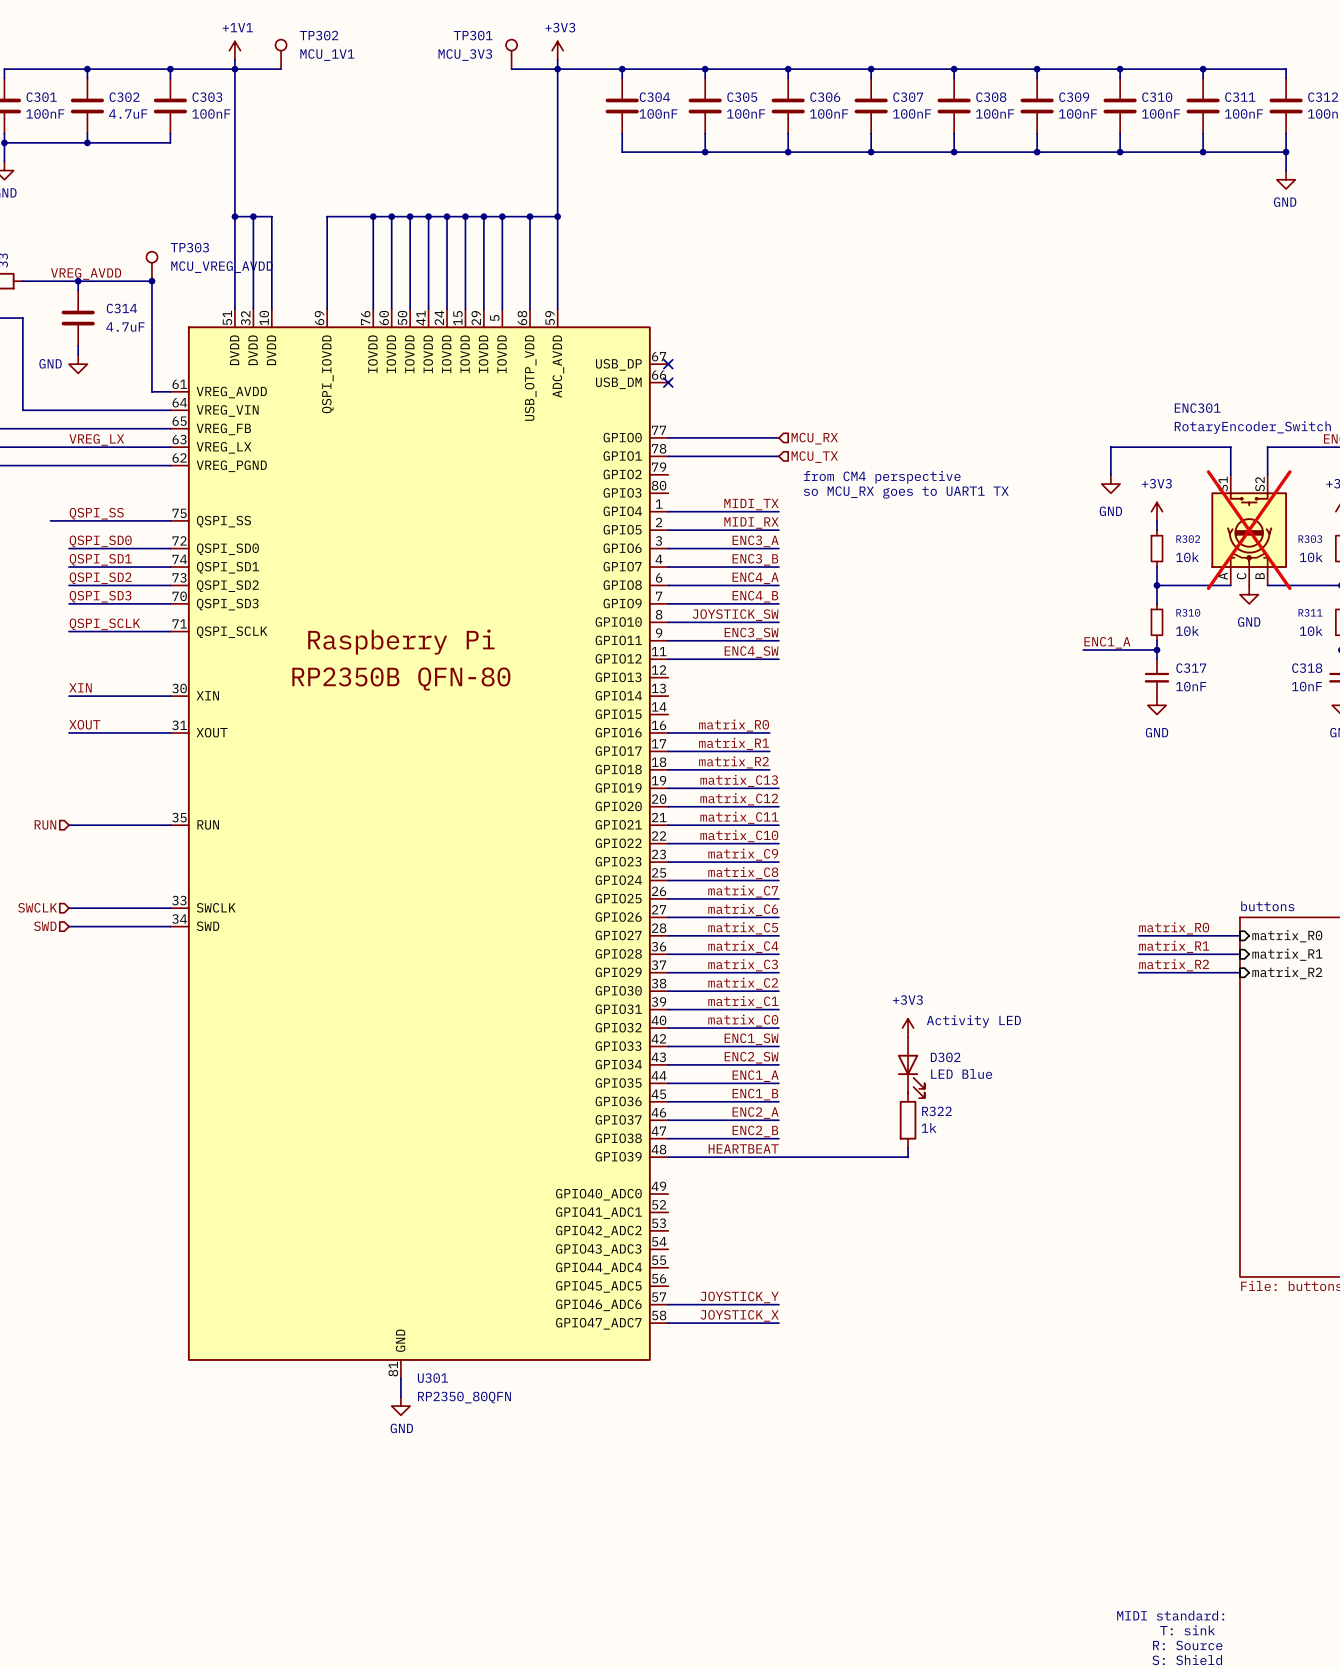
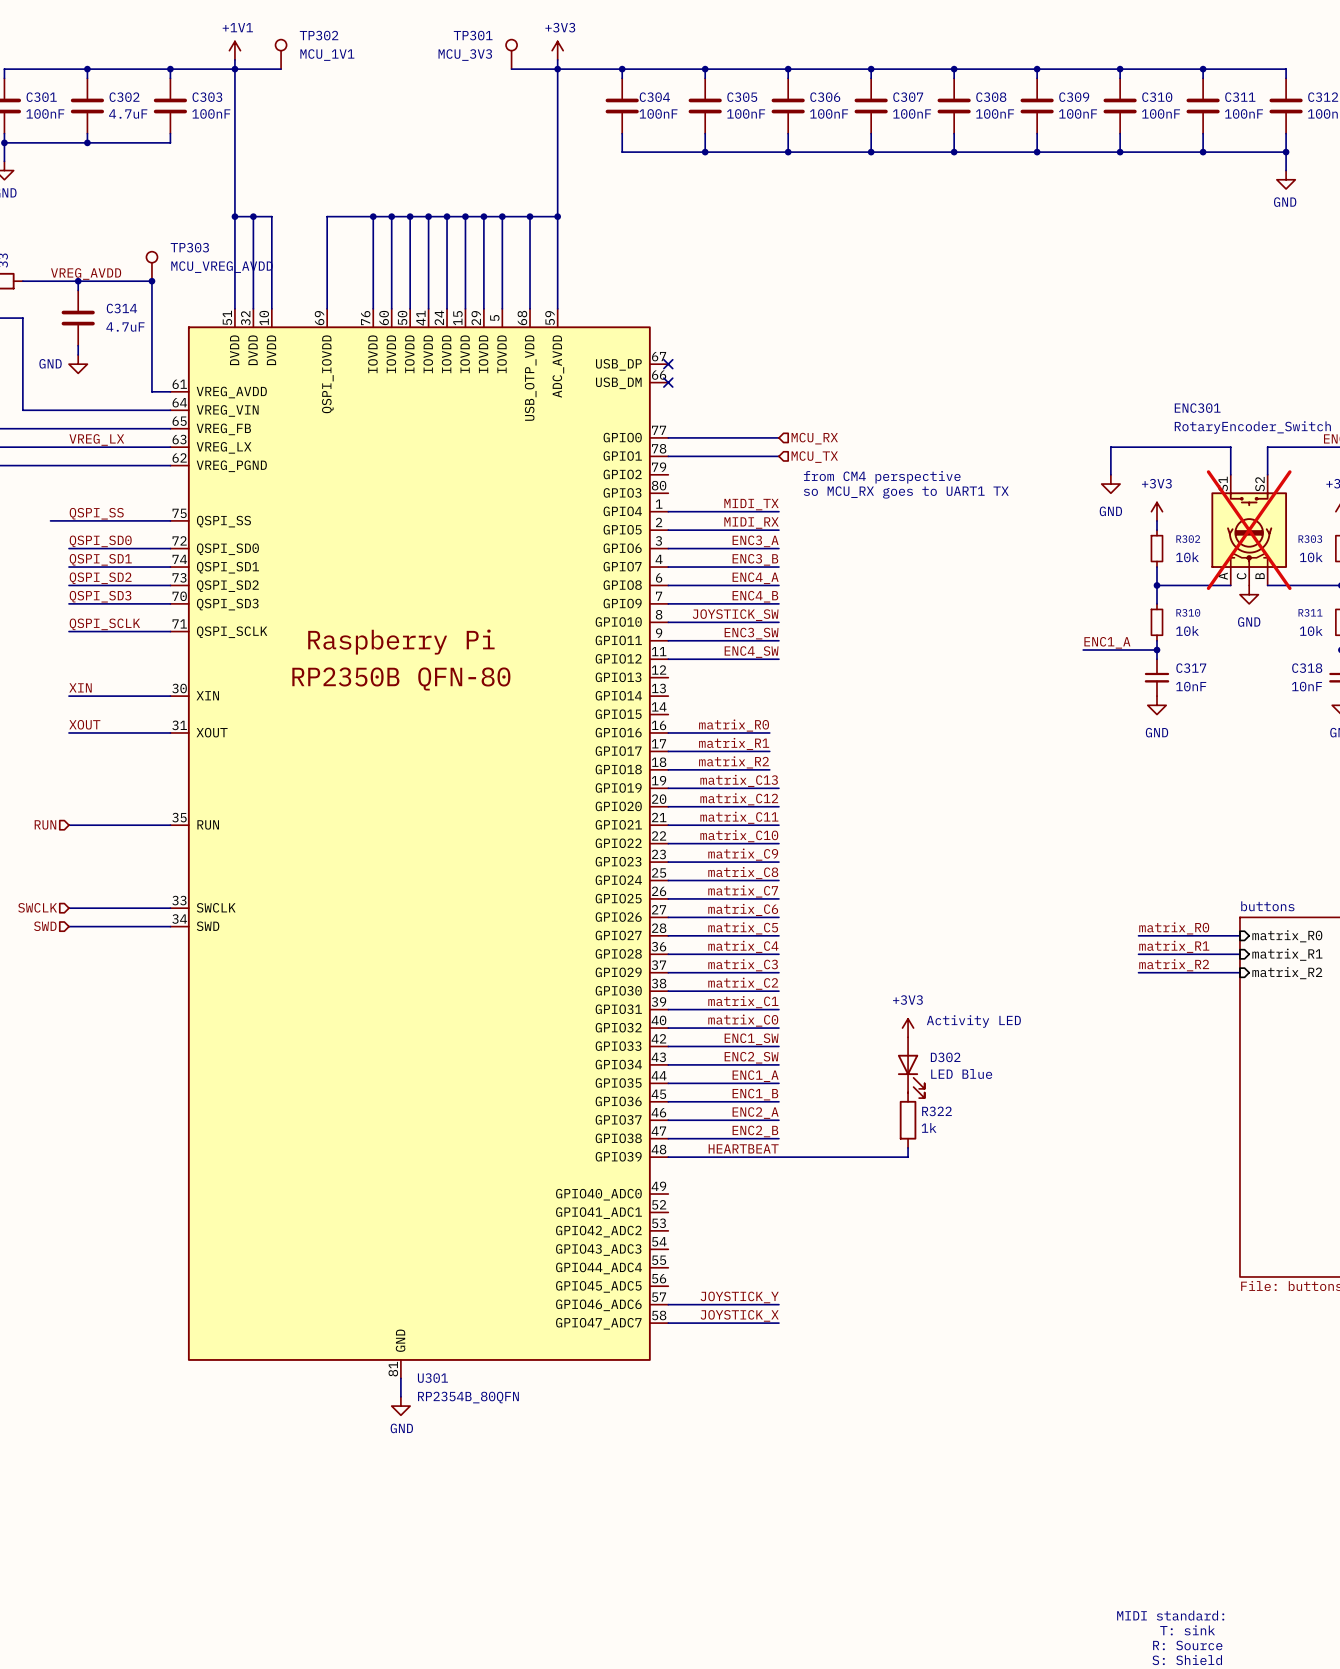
U301 value: RP2350_80QFN (464, 1397) -> RP2354B_80QFN (468, 1397)

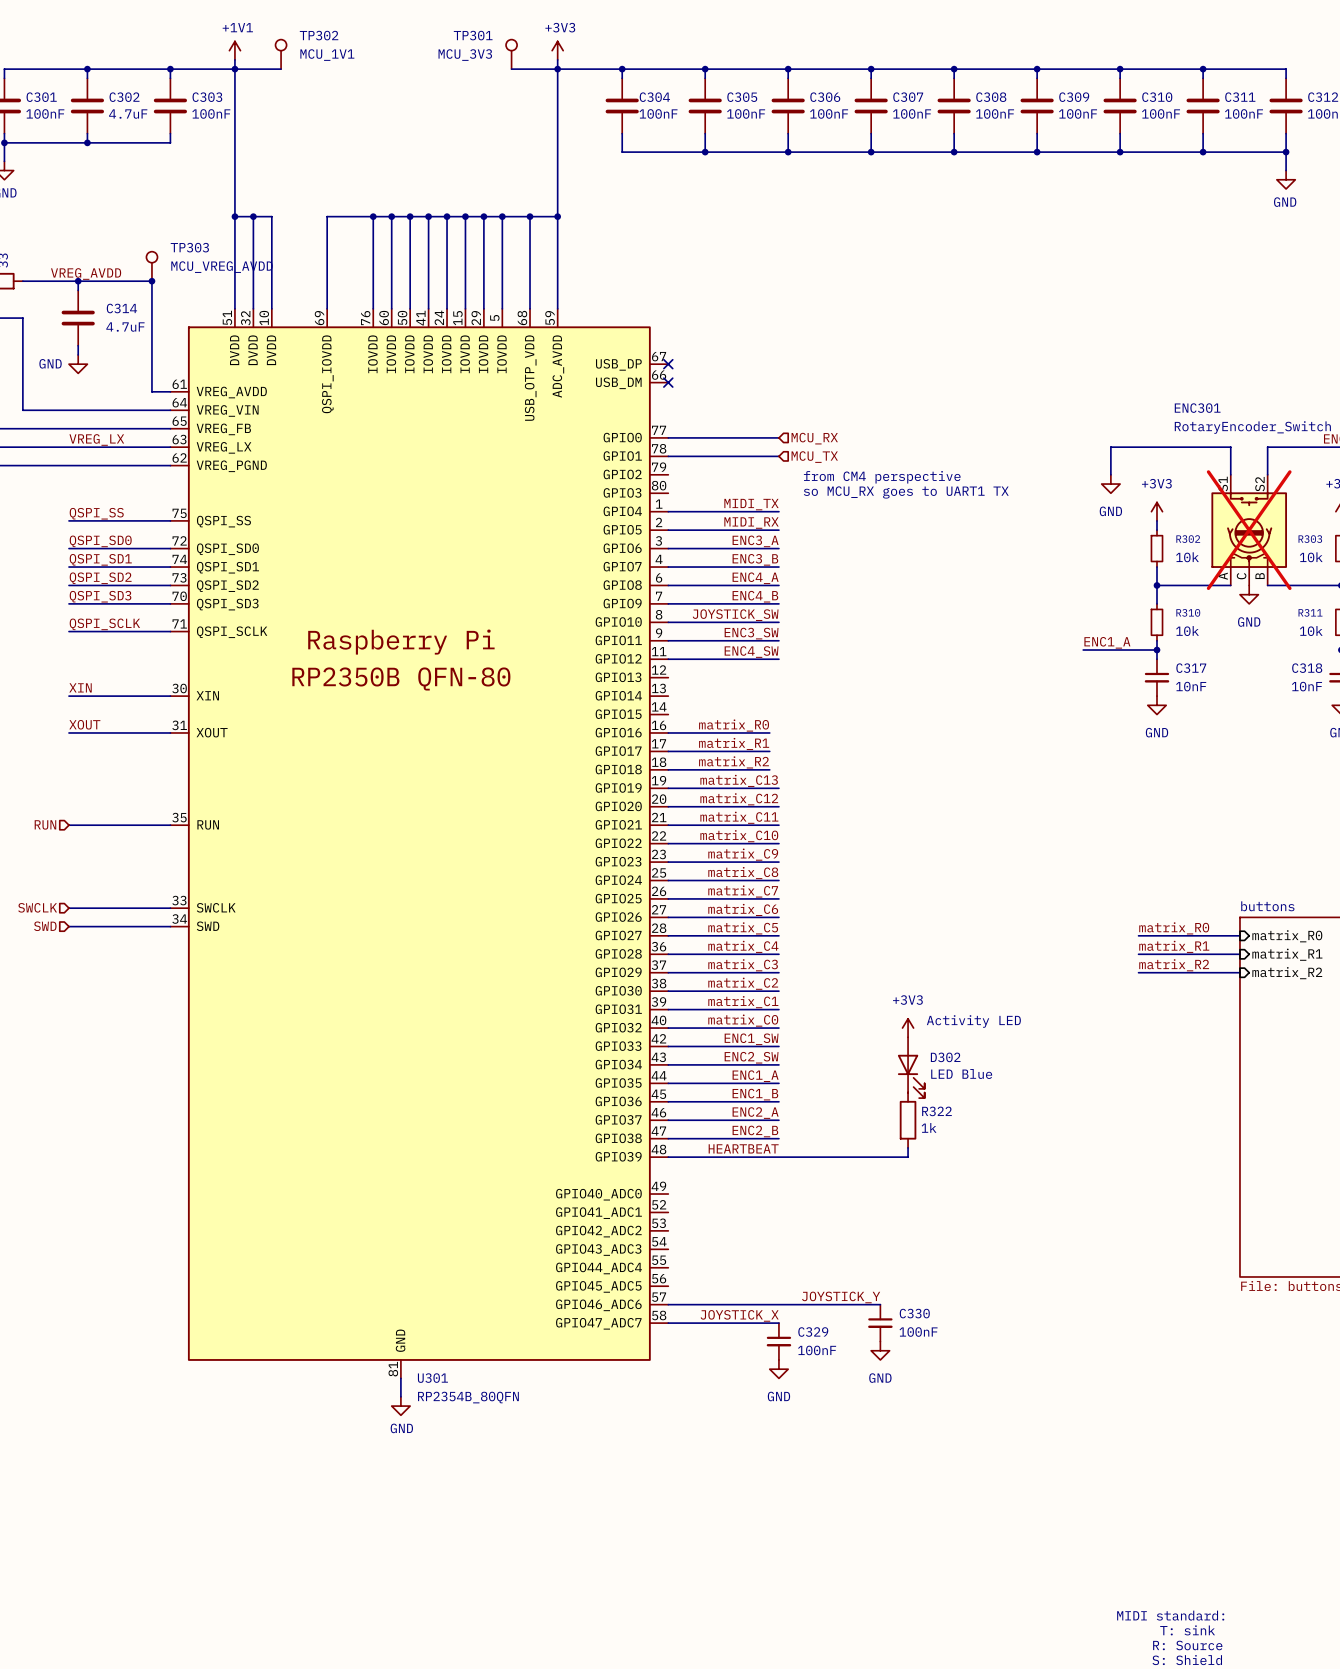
wire: (50, 520) (68, 520) -> none
label position: JOYSTICK_Y (739, 1297) -> JOYSTICK_Y (841, 1297)
wire: none -> (778, 1304) (880, 1304)
C330: none -> 100nF (880, 1323)
C329: none -> 100nF (778, 1341)
power symbol: none -> GND (880, 1350)
power symbol: none -> GND (778, 1369)

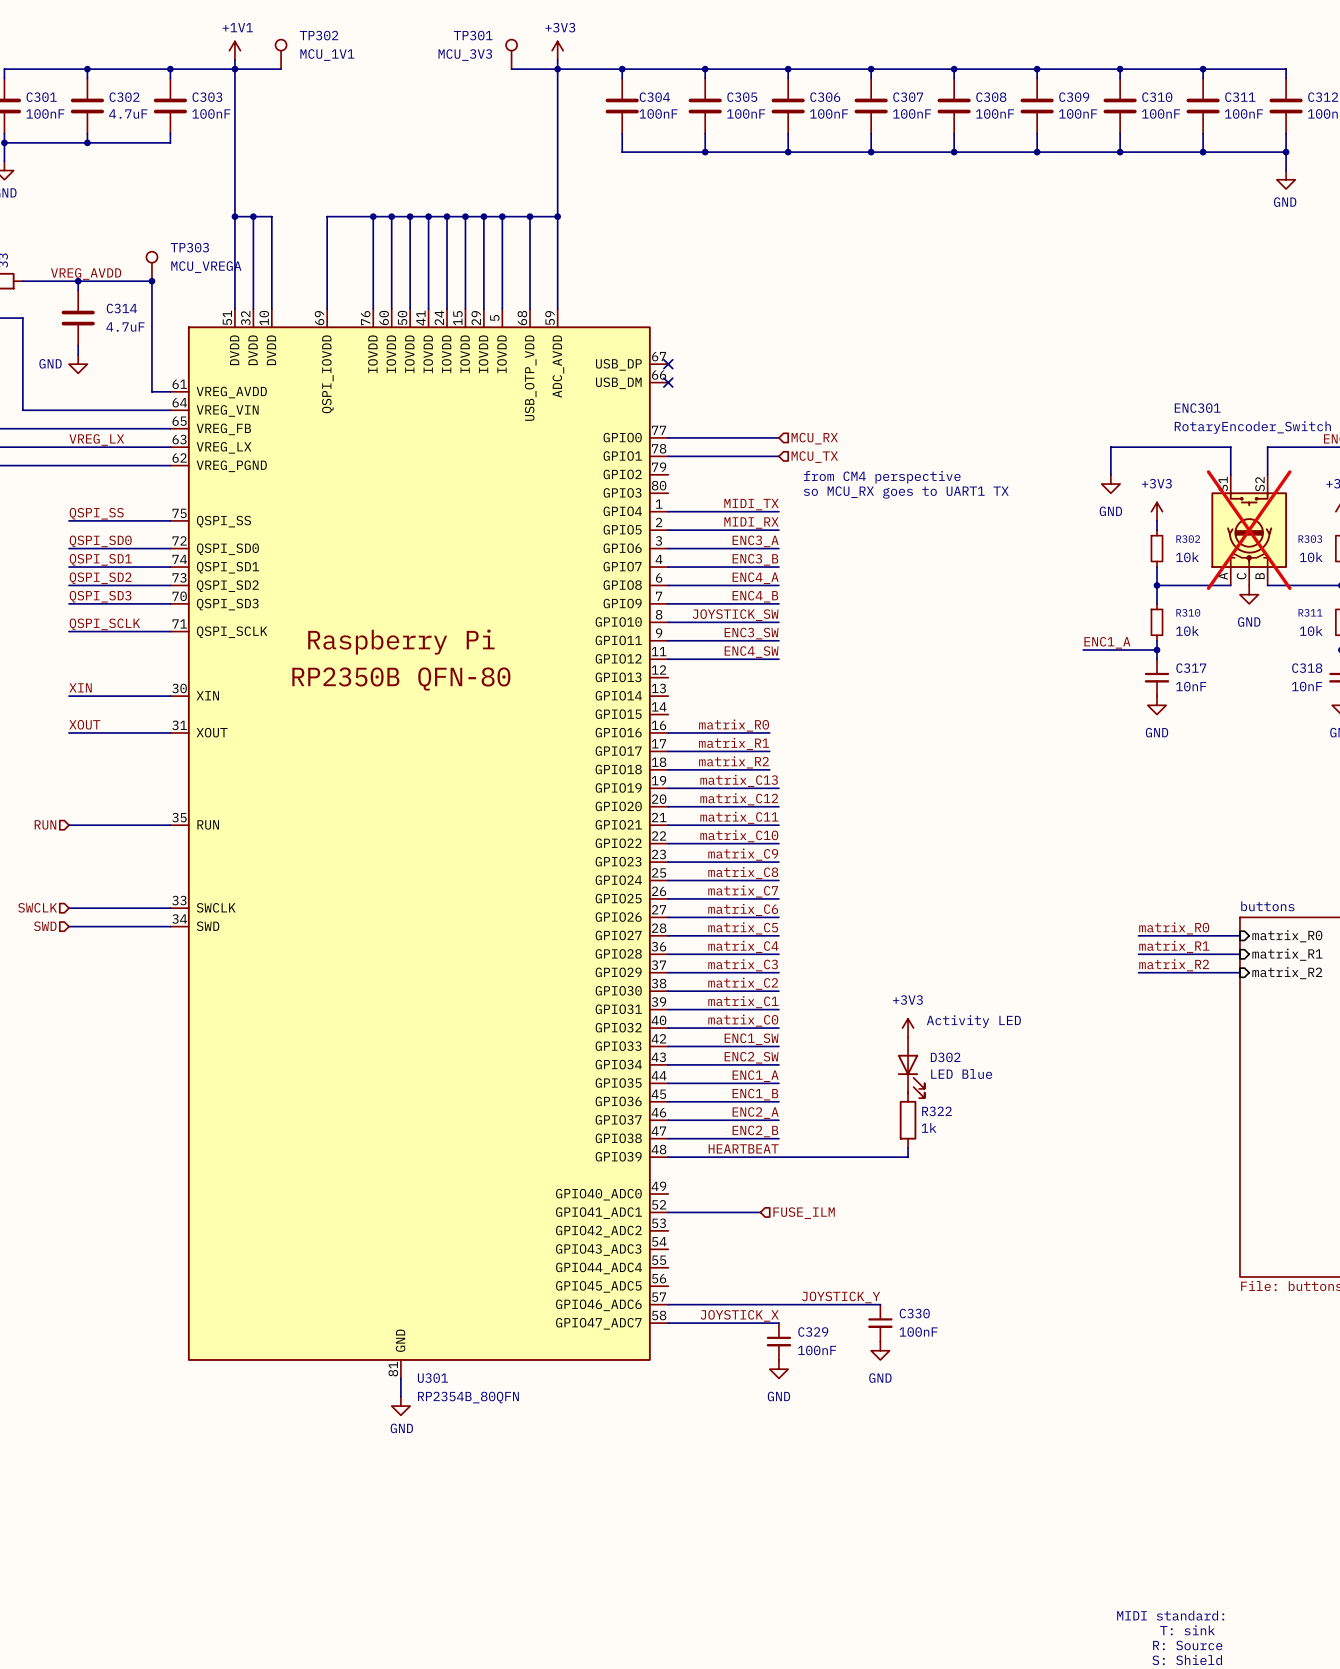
TP303 value: MCU_VREG_AVDD (222, 267) -> MCU_VREGA (206, 267)
wire: none -> (668, 1212) (760, 1212)
hierarchical label: none -> FUSE_ILM (804, 1213)

